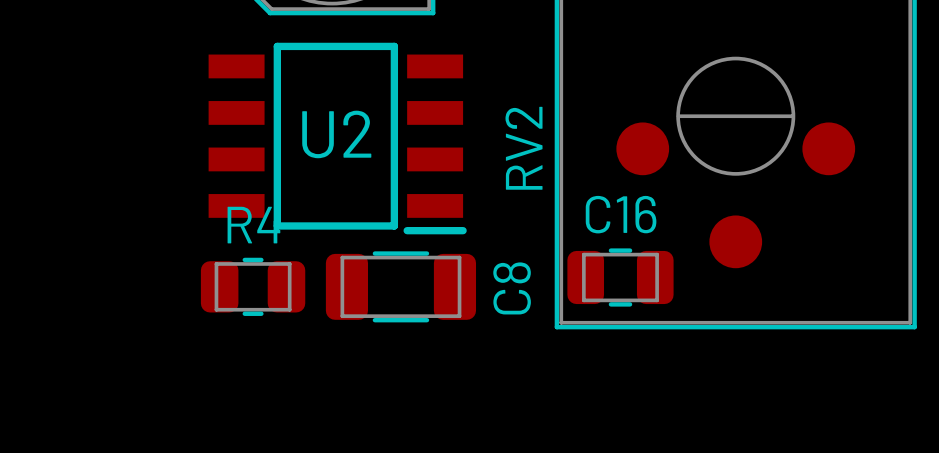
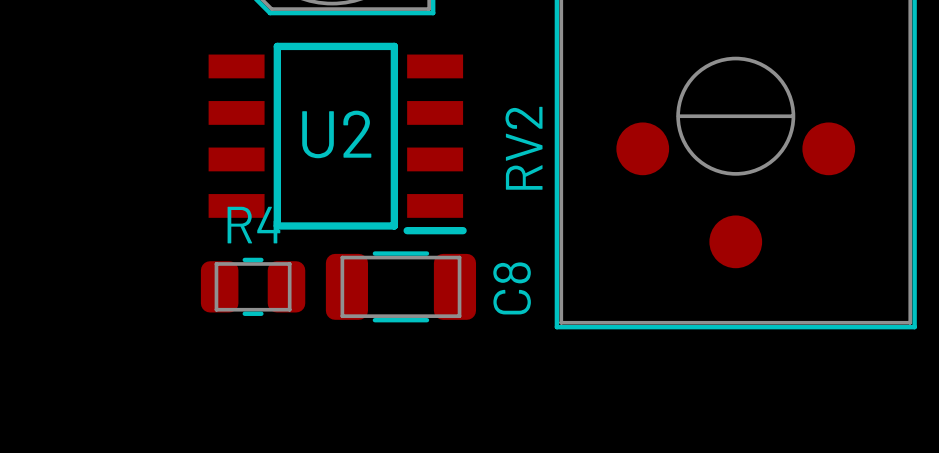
C16: (620, 277) -> none

